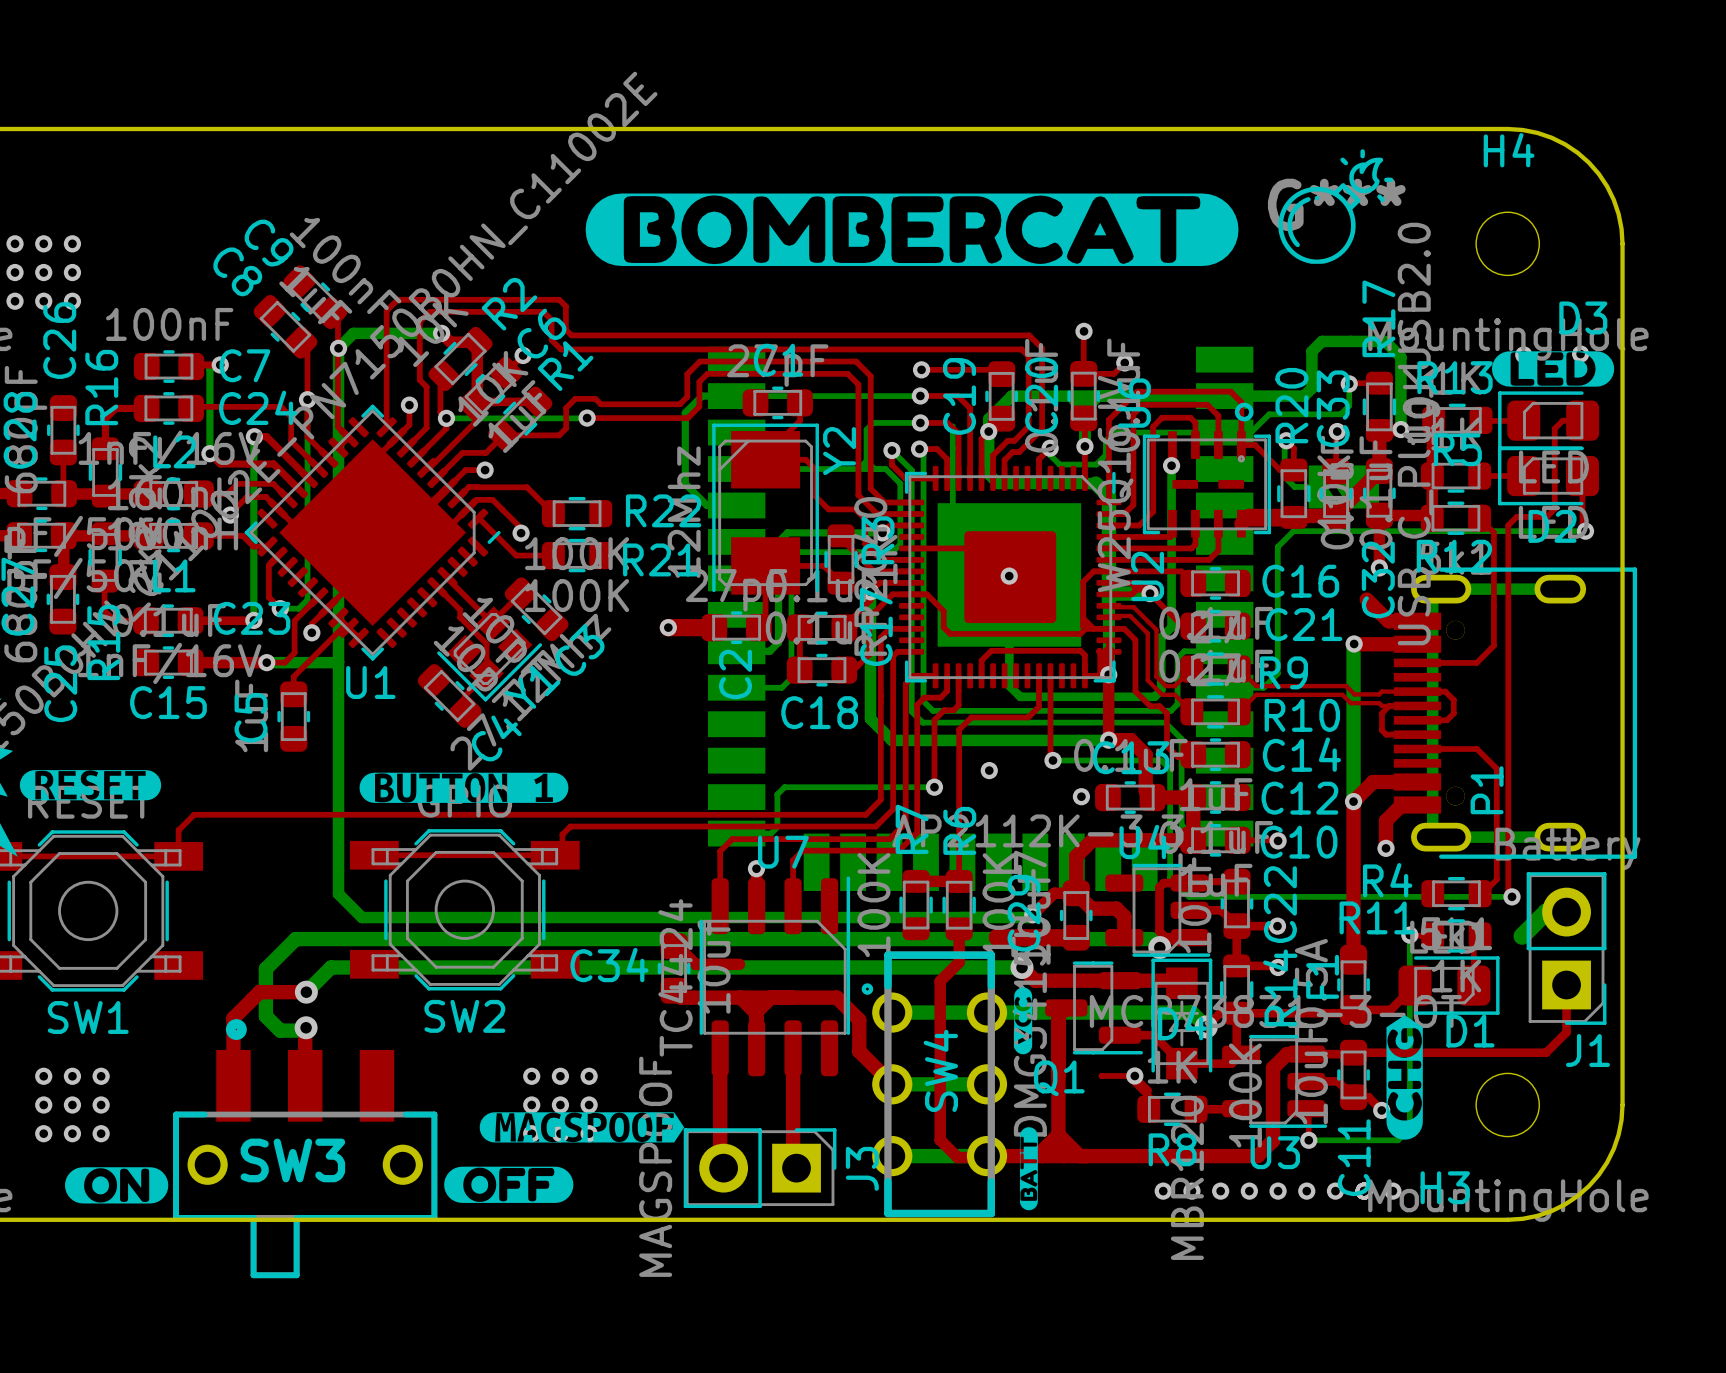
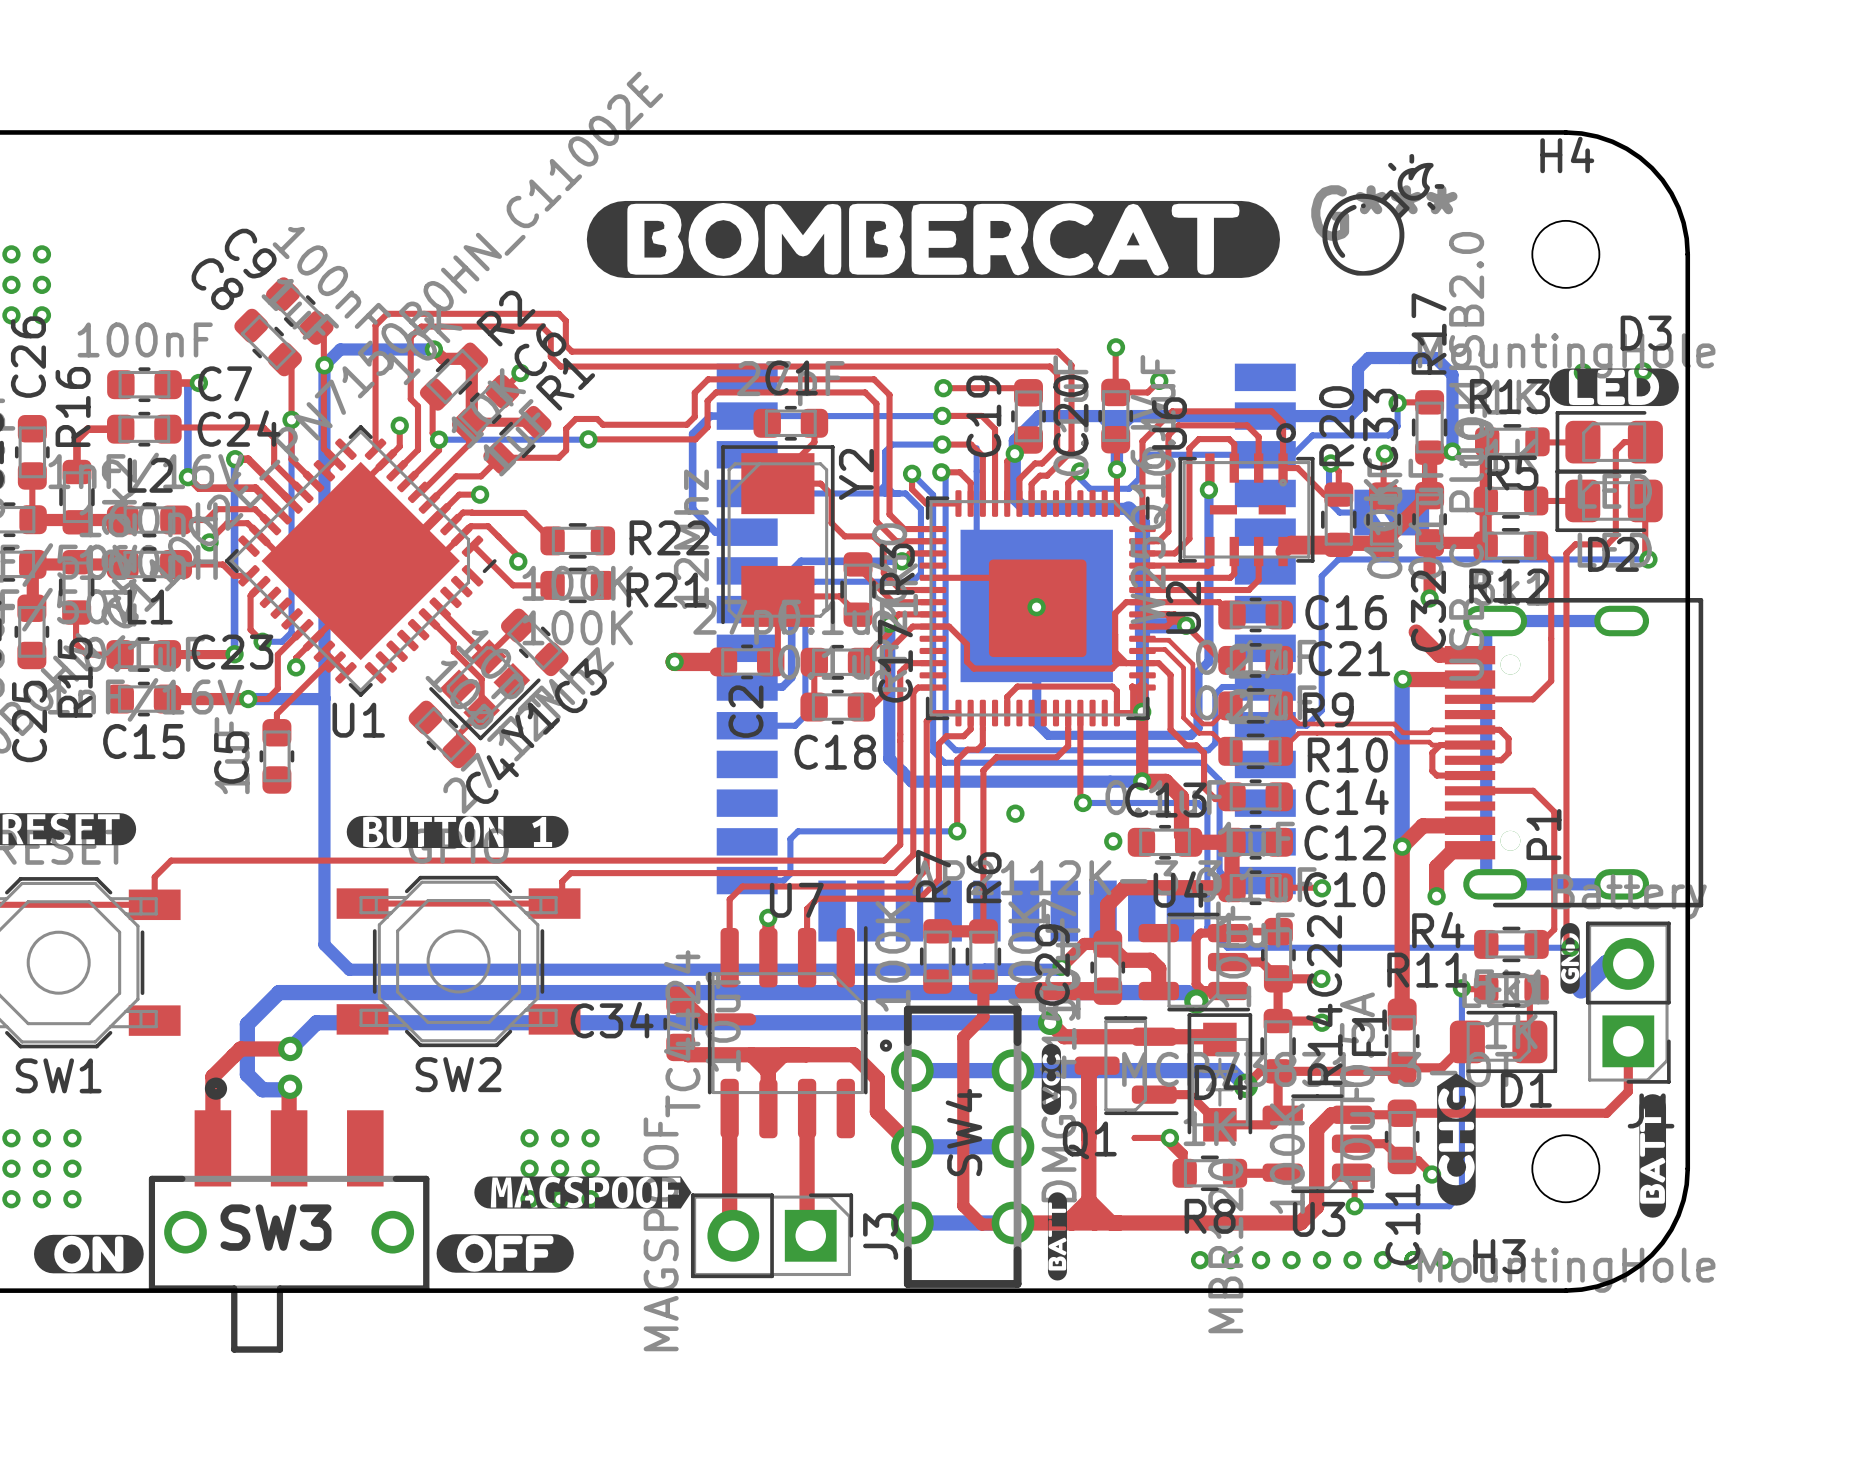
drawing: none -> [1560, 923, 1580, 994]
drawing: none -> [1639, 1094, 1667, 1218]

